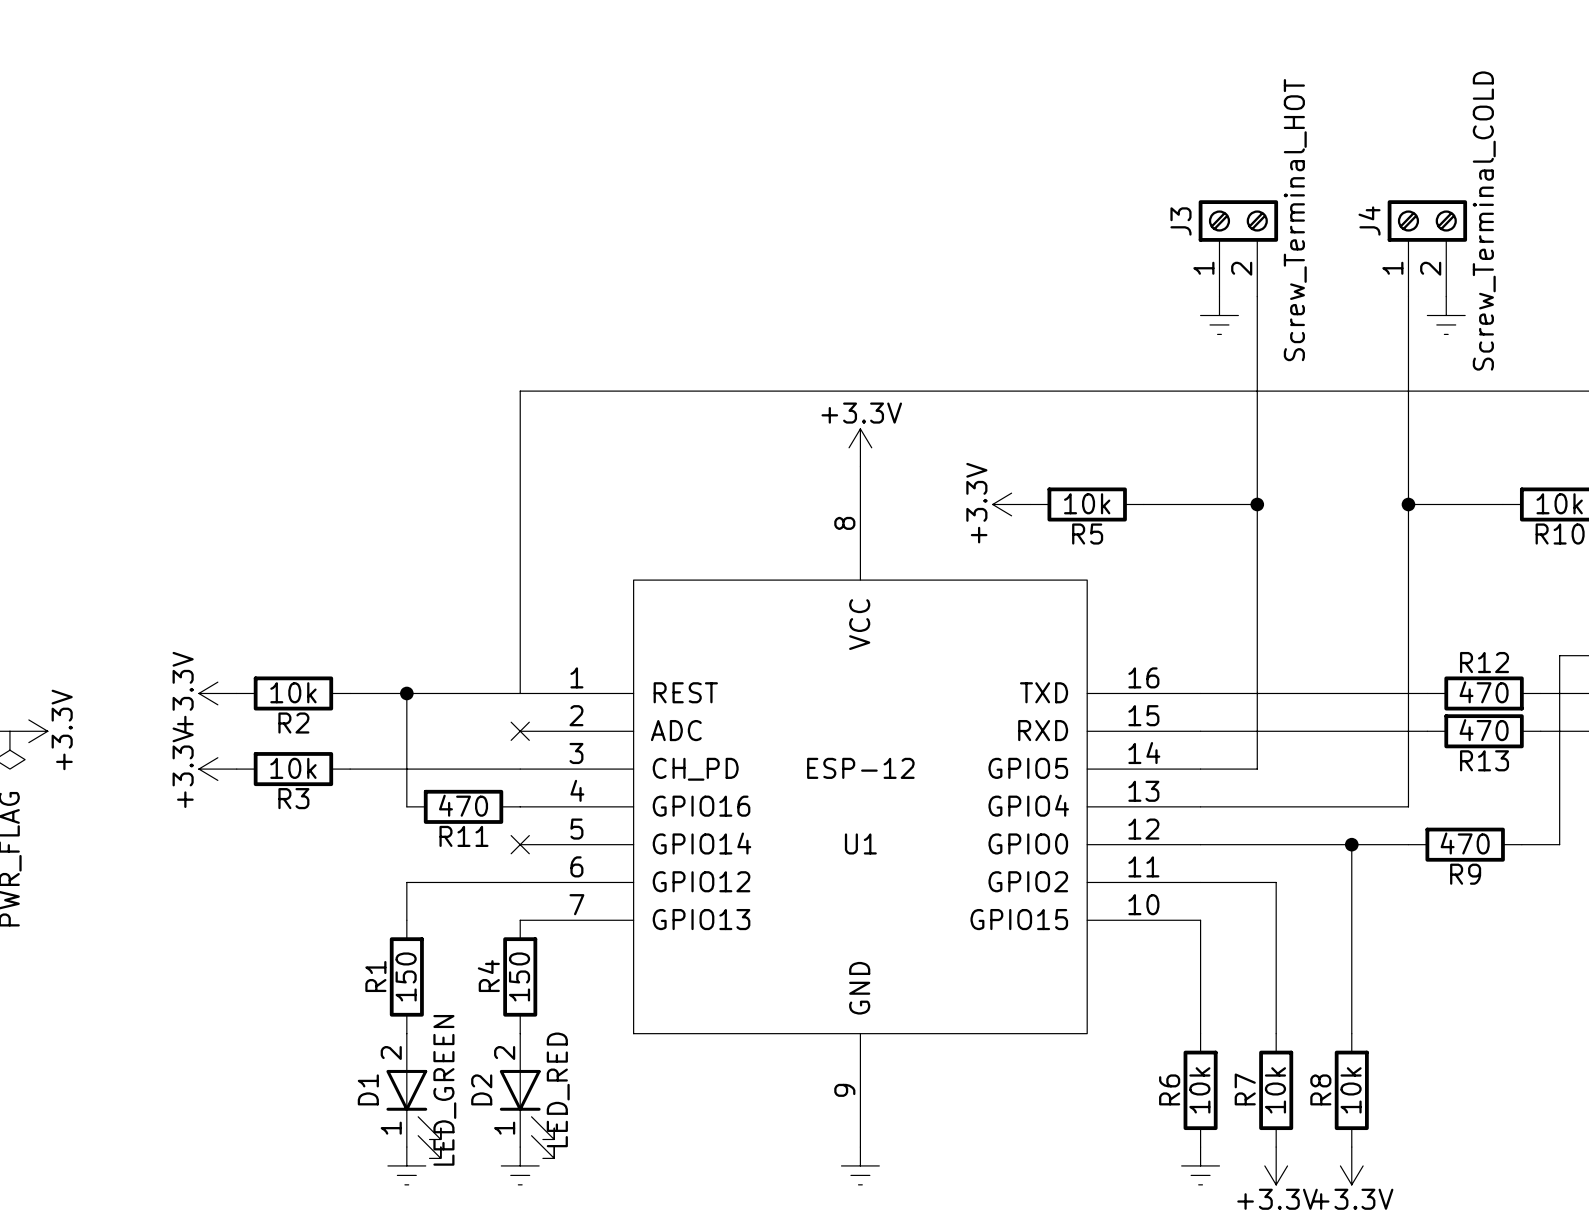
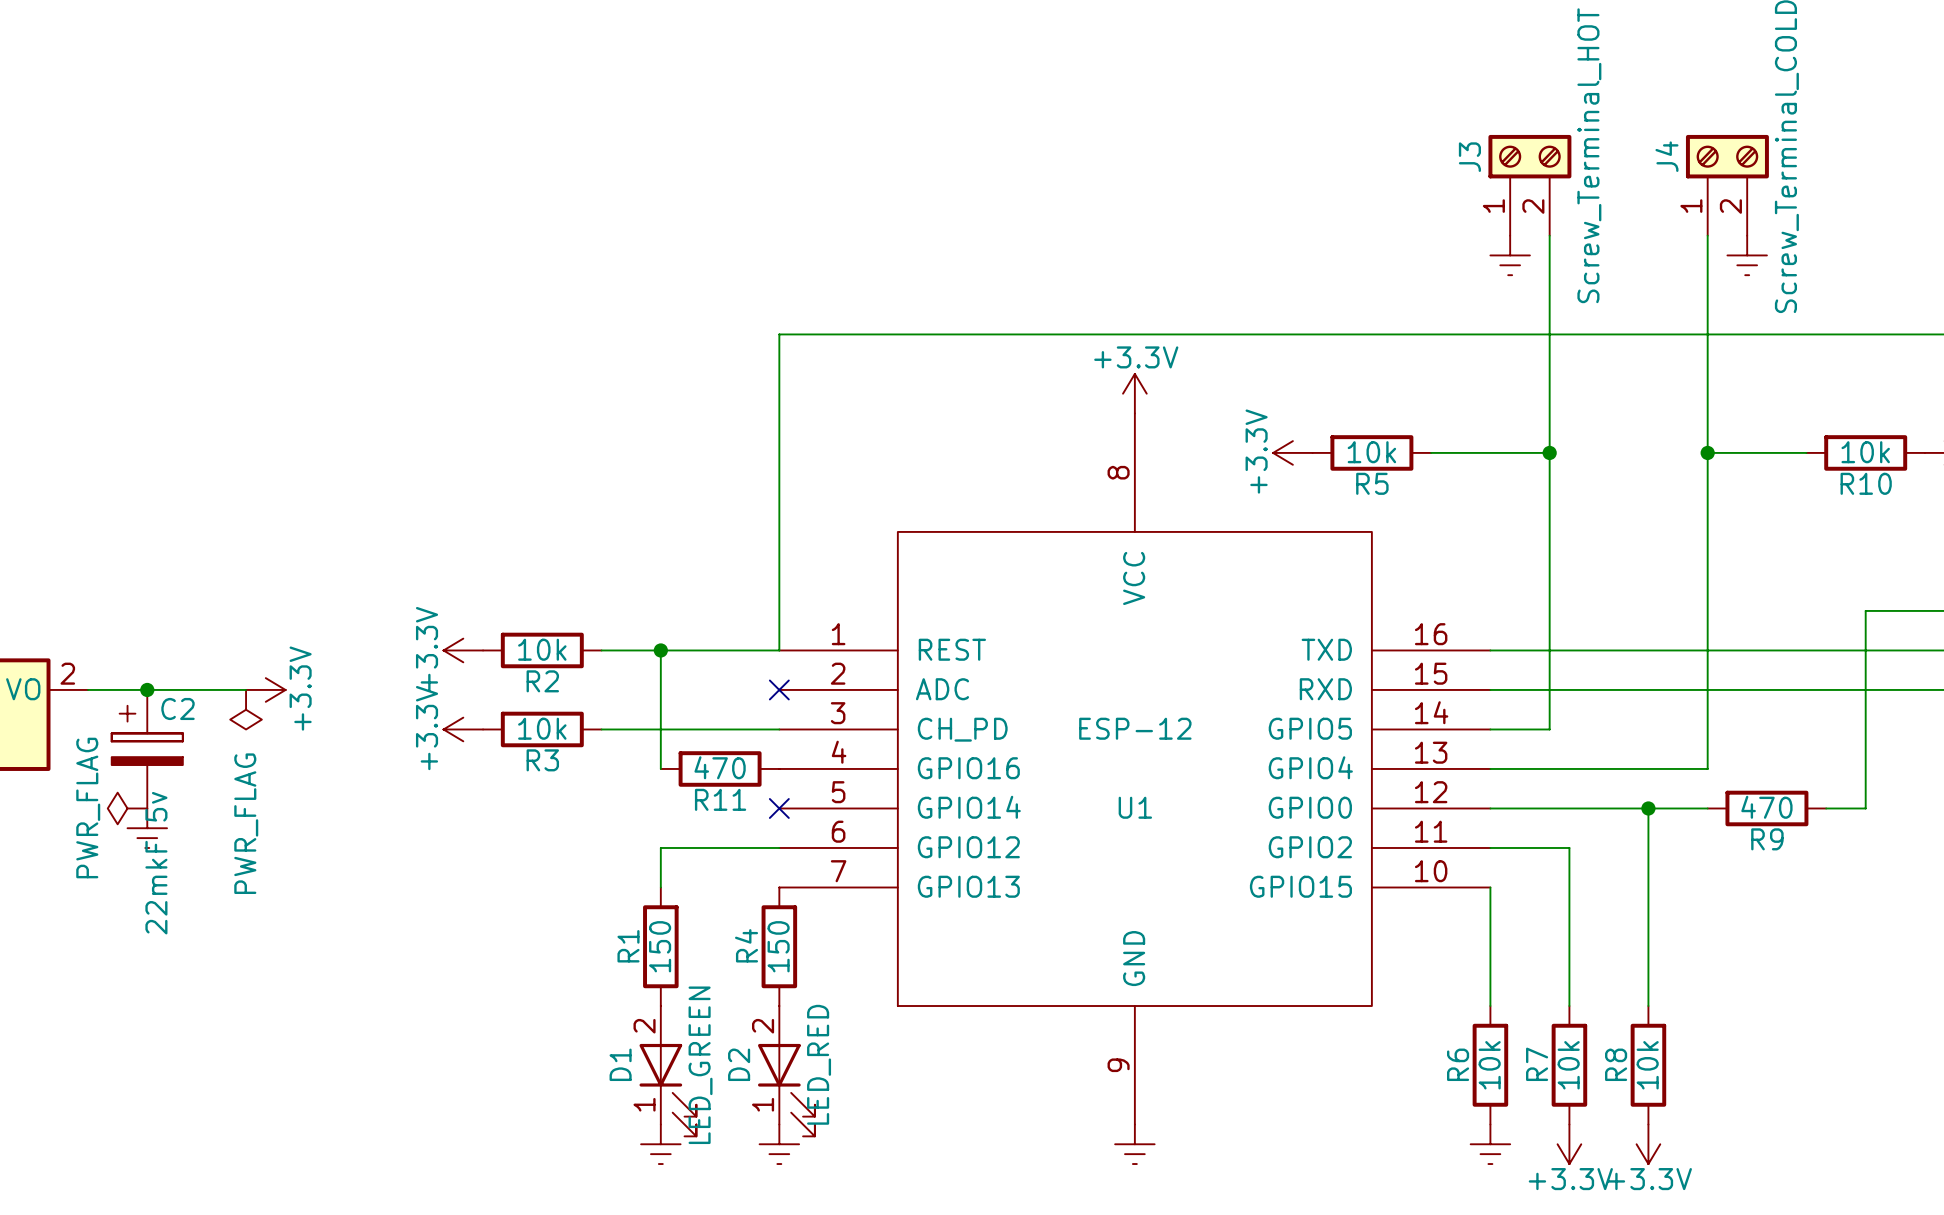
wire: none -> (1727, 650) (1845, 650)
R12: 470 (1484, 693) -> none
wire: none -> (1727, 689) (1845, 689)
R13: 470 (1484, 731) -> none

